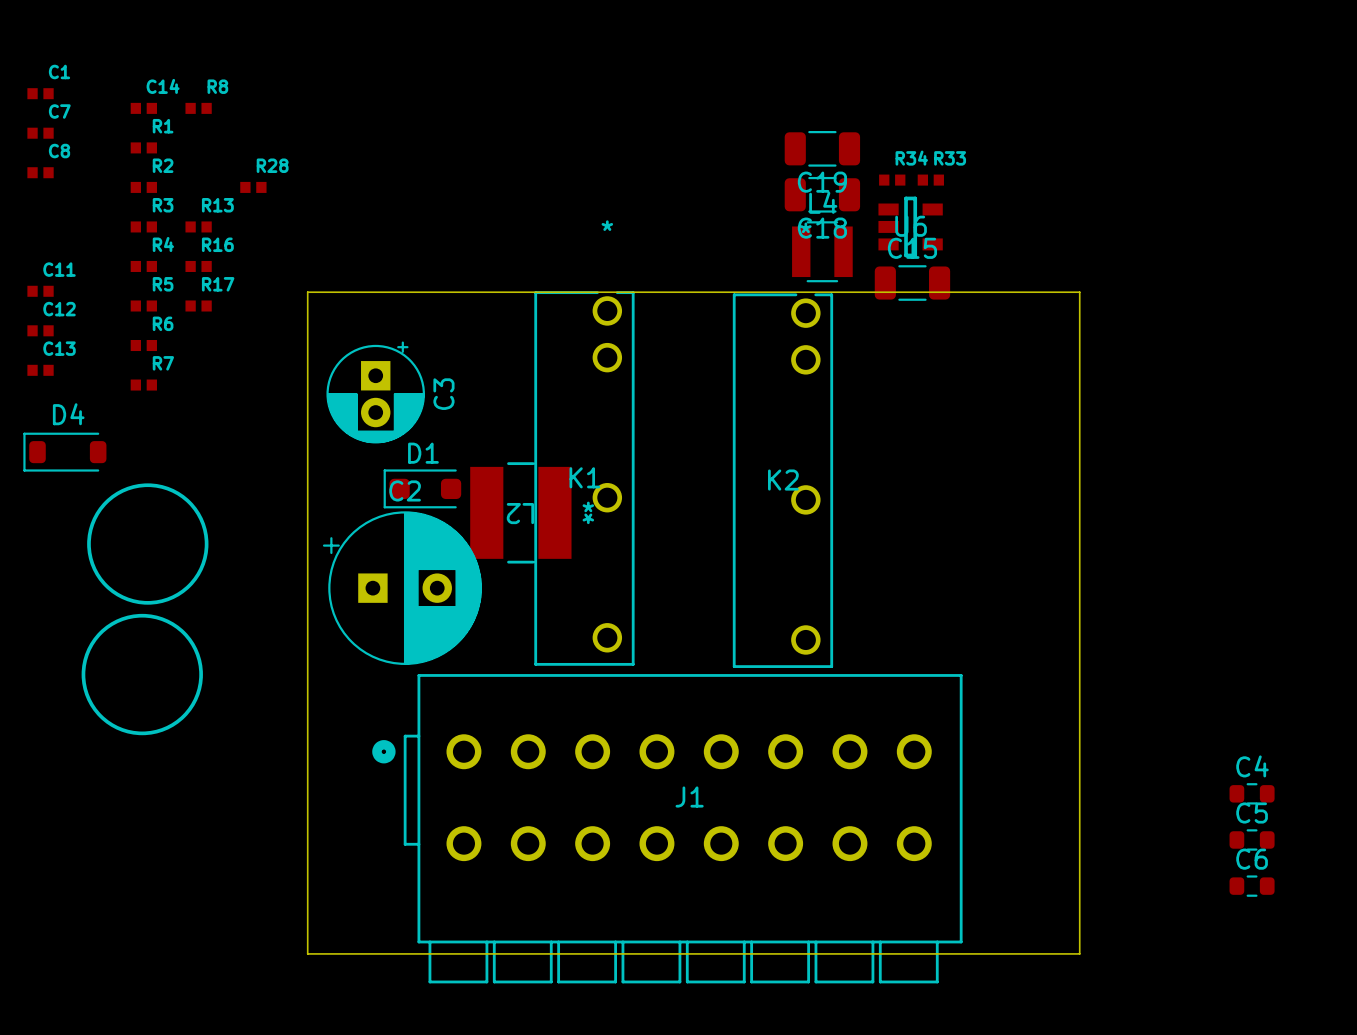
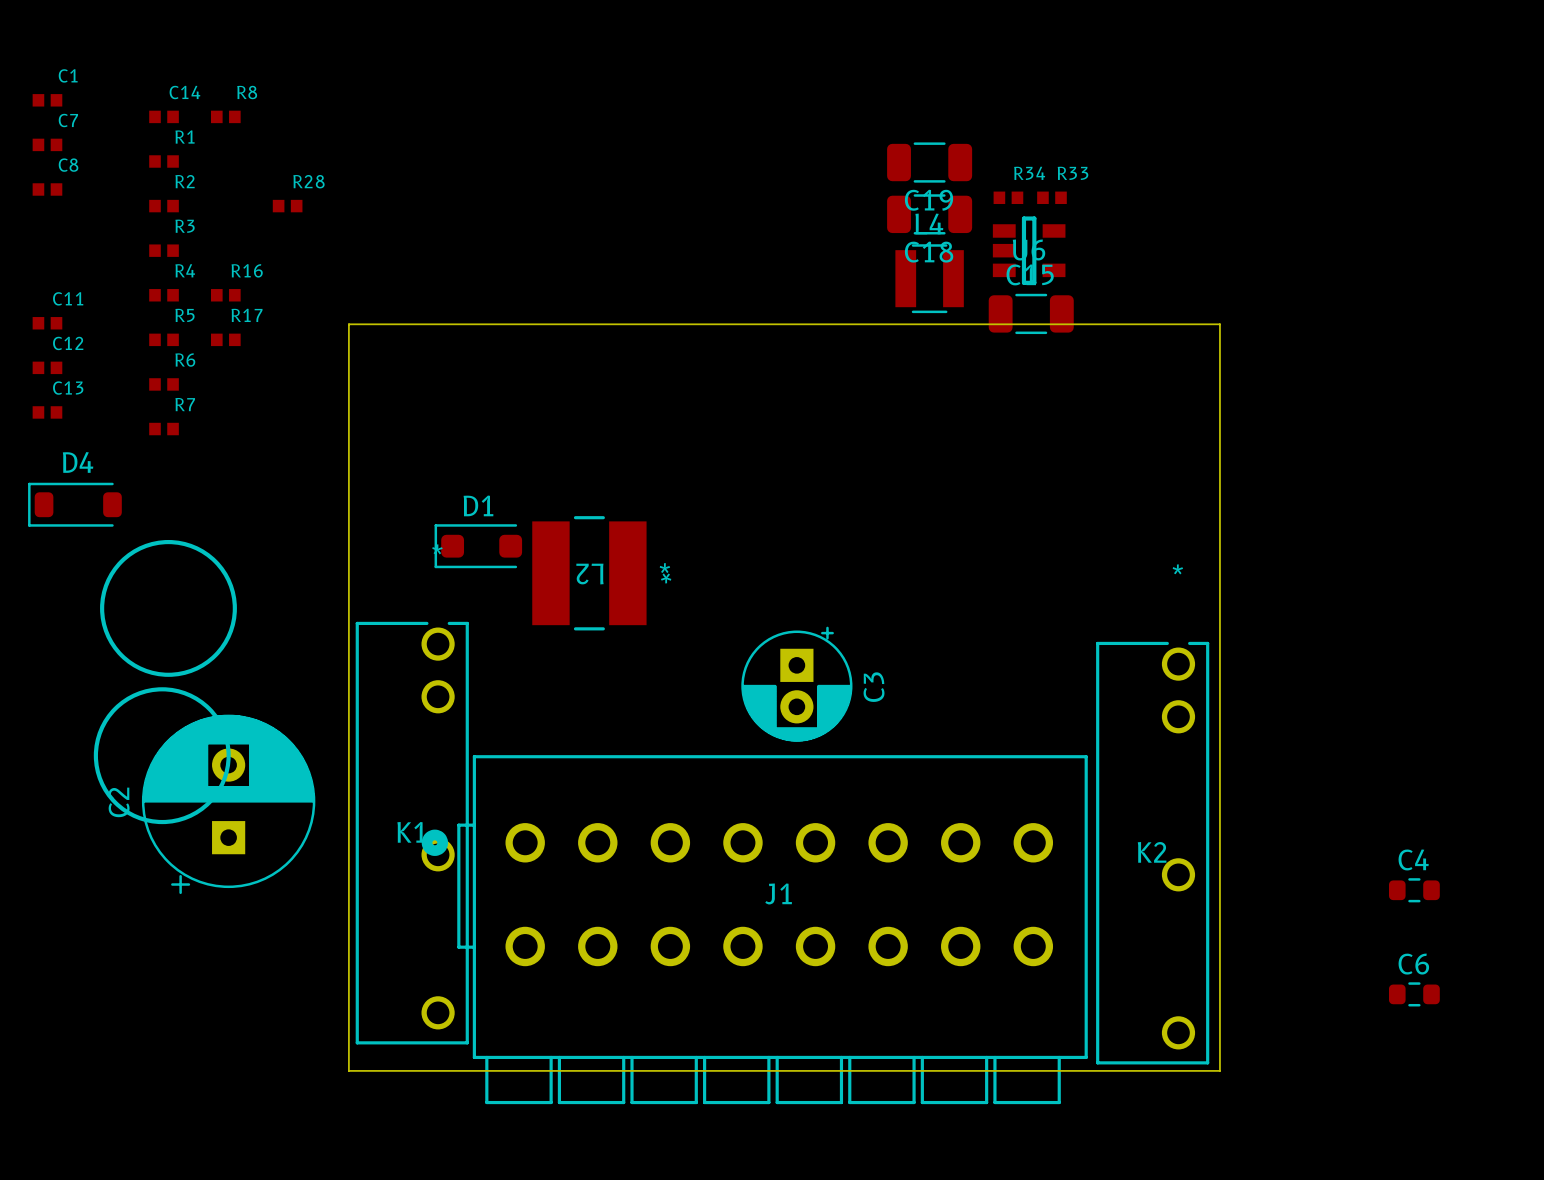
R13: (198, 226) -> none
C3 position: (375, 392) -> (796, 684)
K1 position: (584, 478) -> (412, 833)
K2 position: (782, 480) -> (1152, 853)
C2 rotation: 0° (402, 588) -> 90° counterclockwise (228, 804)
C2 position: (402, 588) -> (228, 804)
C5: (1252, 839) -> none

